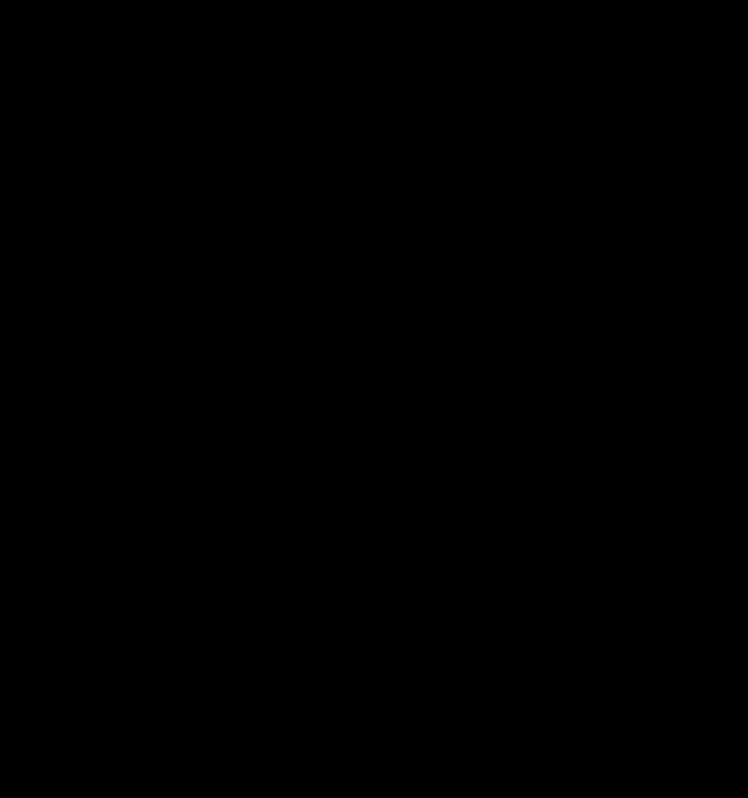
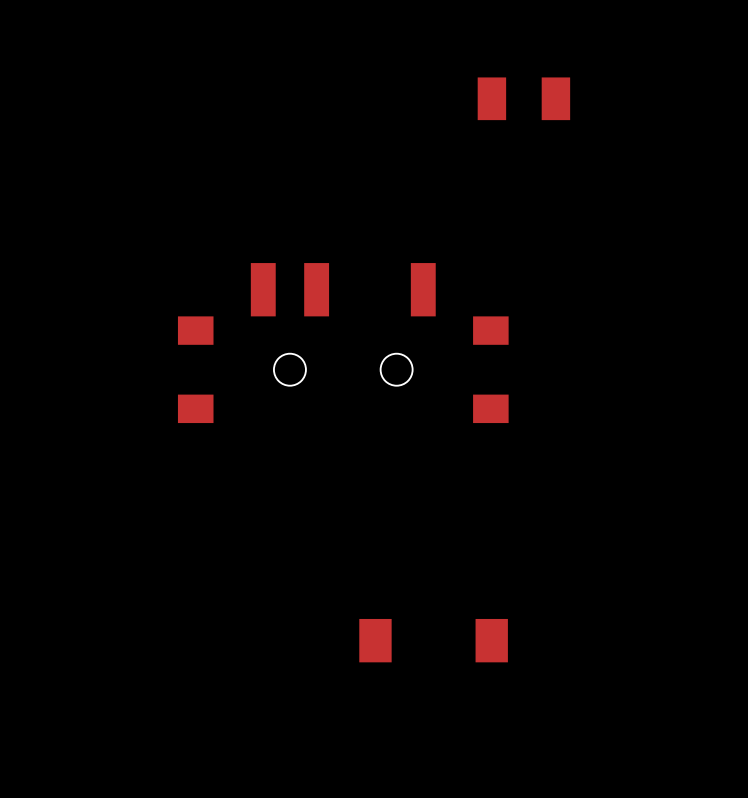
part: none -> (523, 98)
part: none -> (343, 343)
part: none -> (433, 640)

